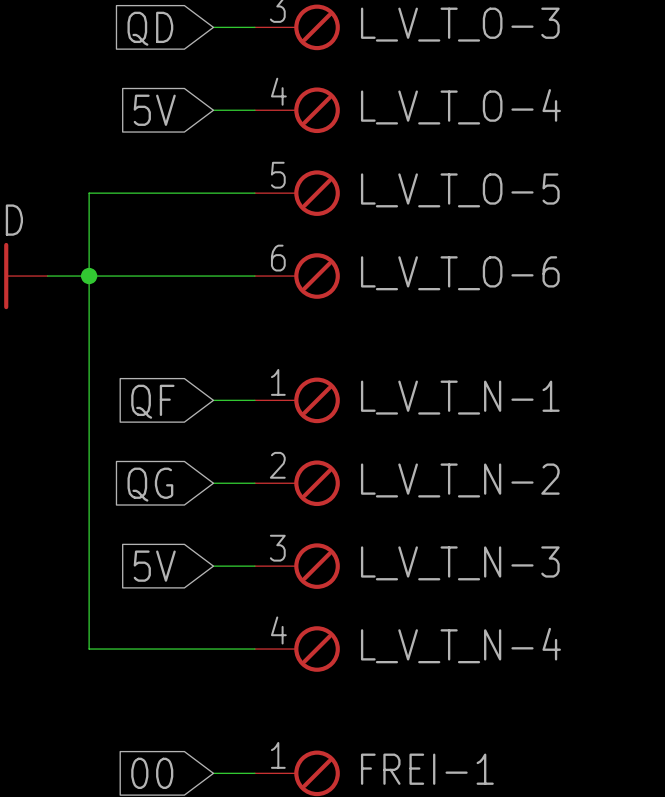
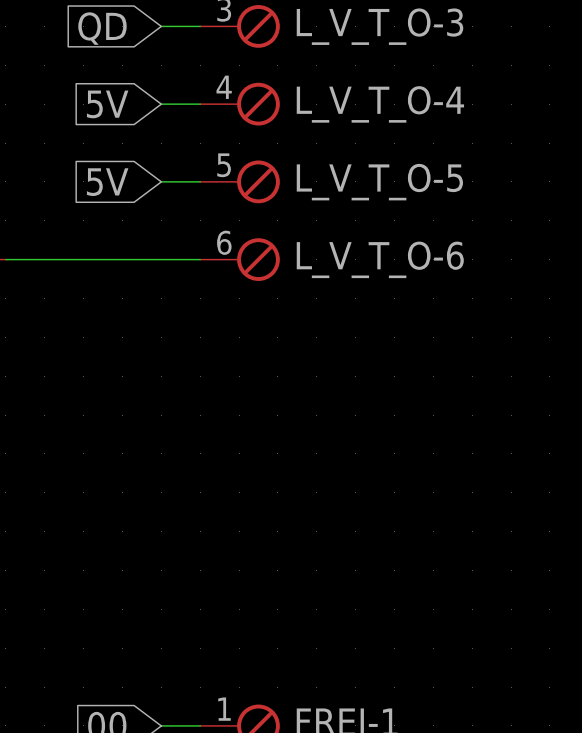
wire: (213, 193) (89, 193) (89, 649) (254, 649) -> none
junction: (89, 276) -> none
wire: (213, 400) (254, 400) -> none
L_V_T_N-1: (297, 400) -> none
global label: QF (152, 401) -> none
wire: (213, 483) (254, 483) -> none
L_V_T_N-2: (297, 483) -> none
global label: QG (150, 484) -> none
global label position: 5V (154, 566) -> 5V (107, 182)
wire: (213, 566) (254, 566) -> none
L_V_T_N-3: (297, 566) -> none
L_V_T_N-4: (297, 649) -> none

